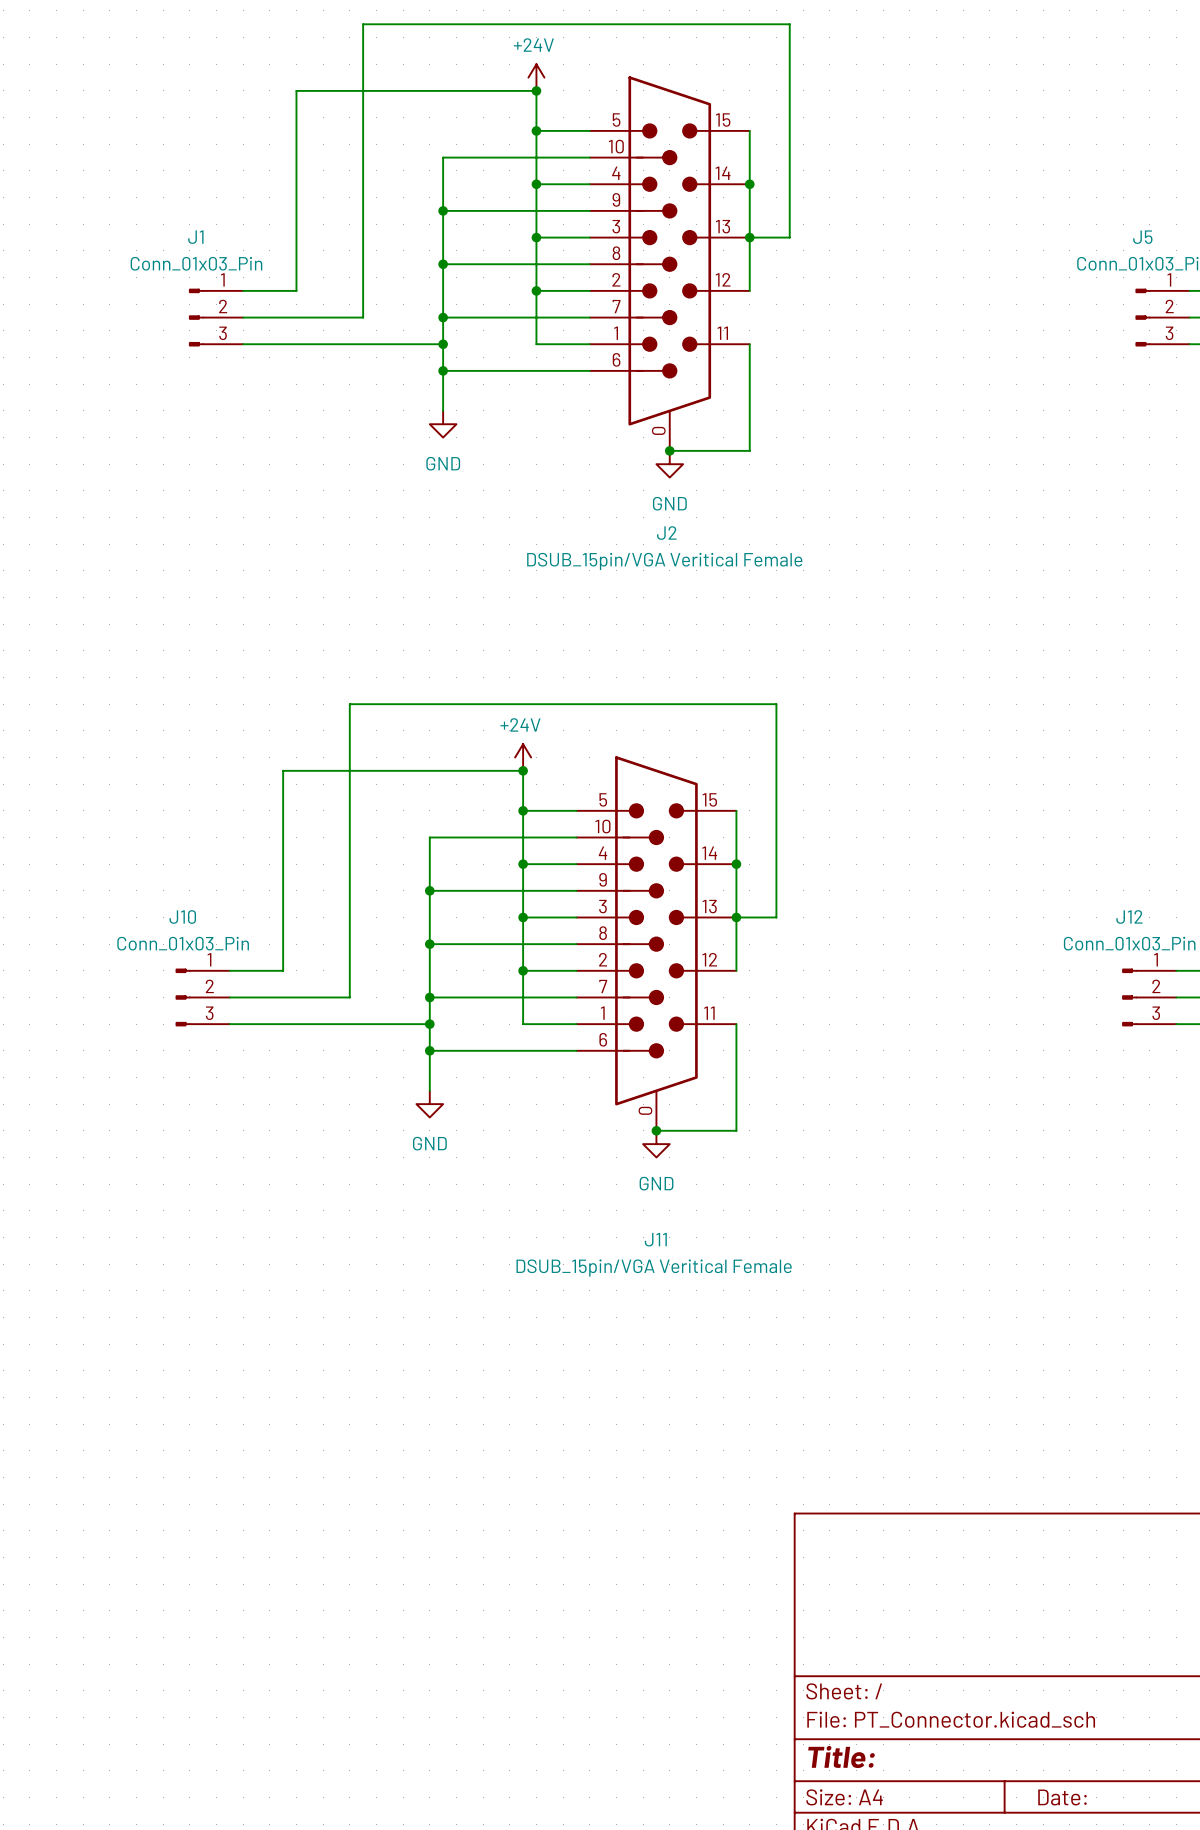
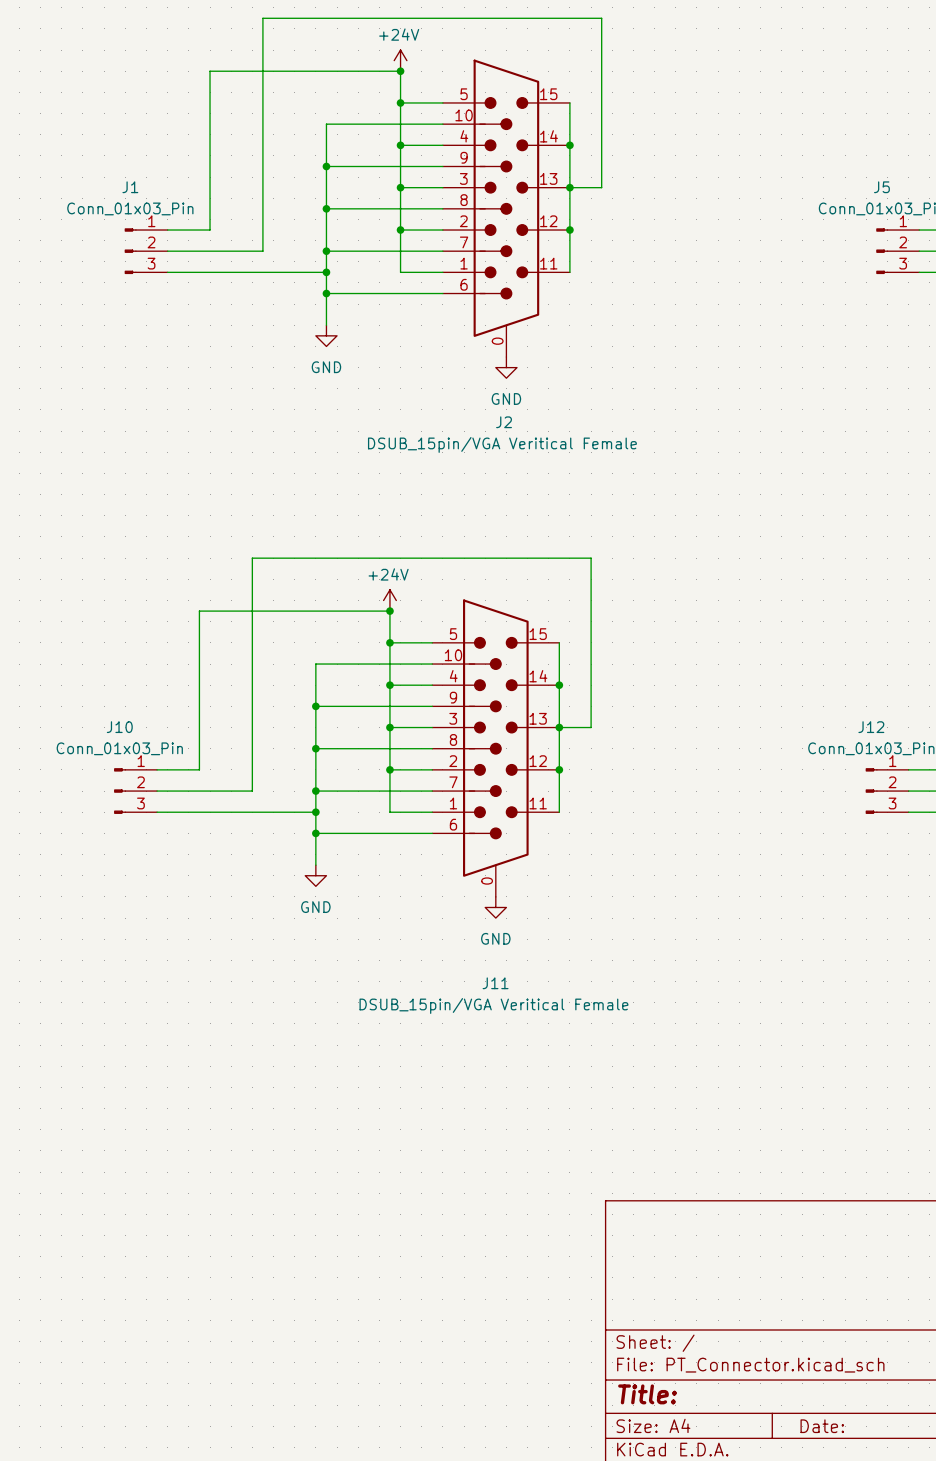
junction: none -> (569, 230)
wire: (749, 344) (749, 450) (669, 450) -> (569, 272) (569, 230)
junction: (669, 450) -> none
junction: none -> (559, 769)
wire: (736, 1024) (736, 1130) (656, 1130) -> (559, 812) (559, 769)
junction: (656, 1130) -> none

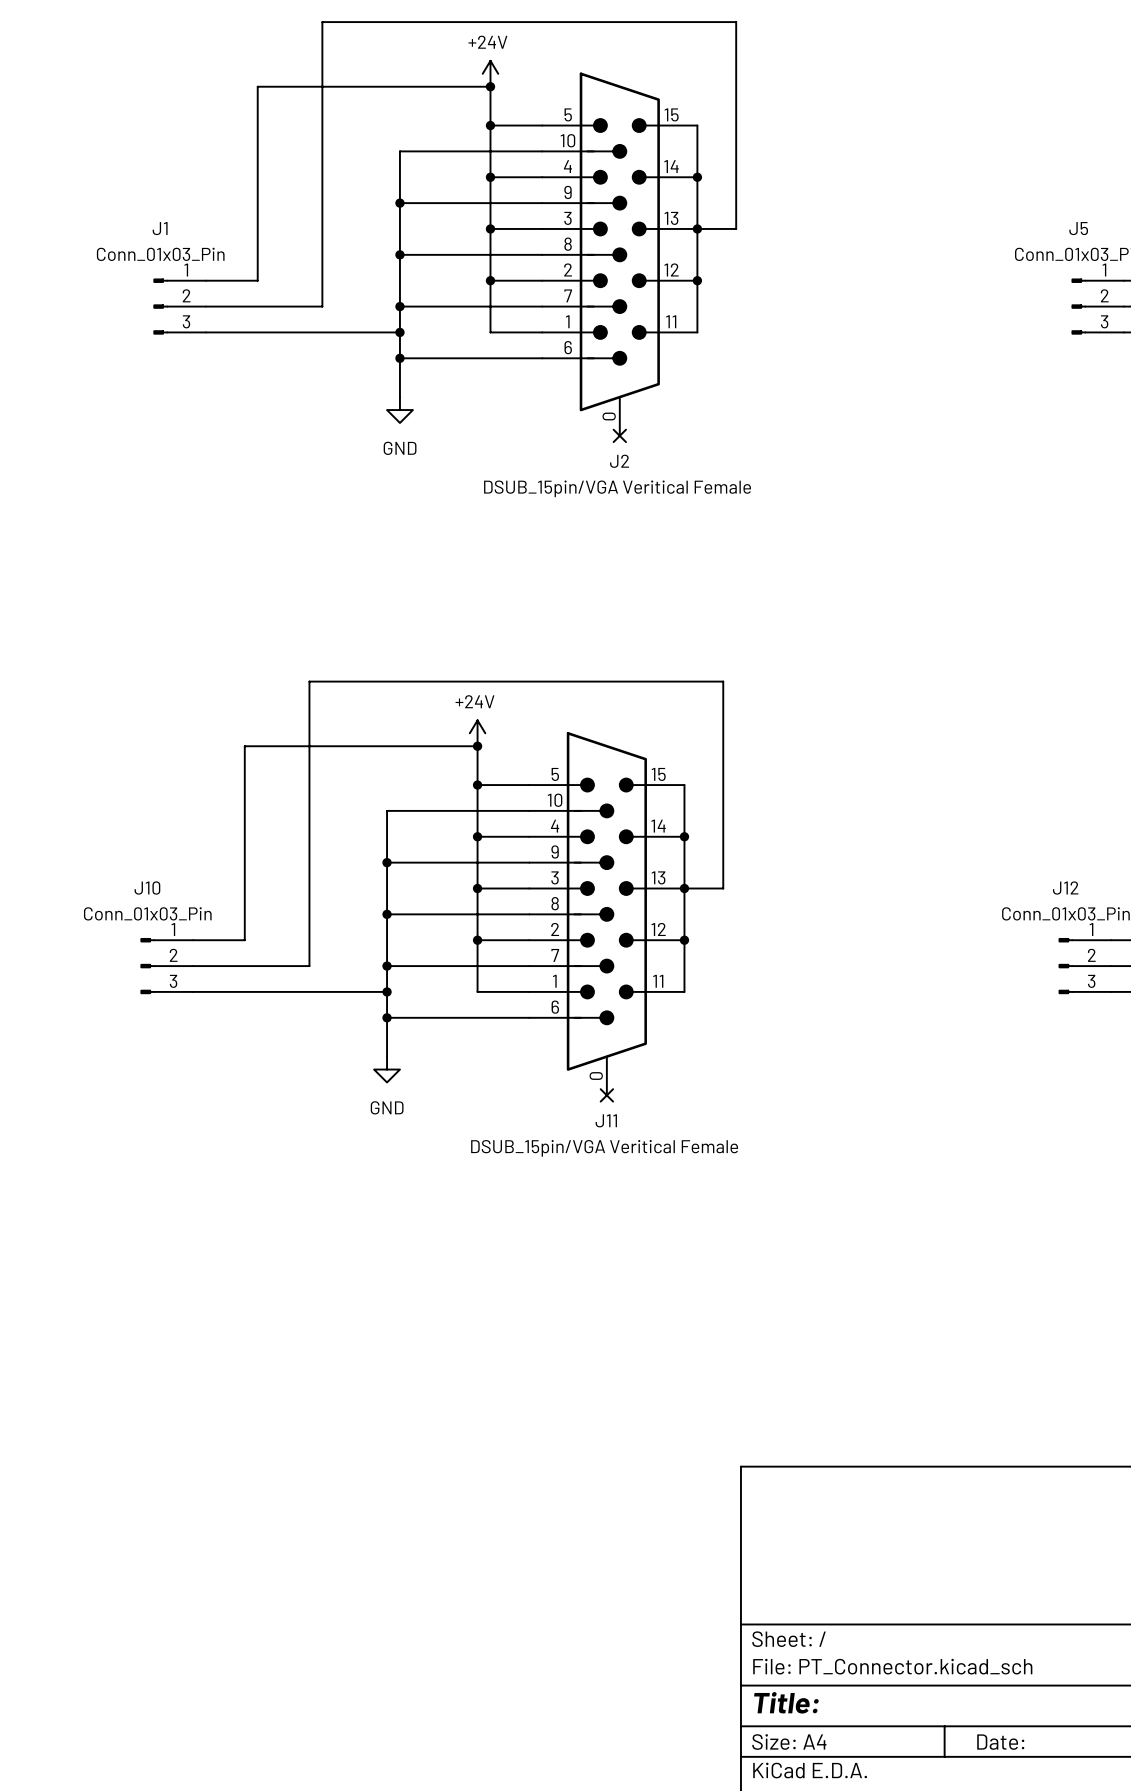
no-connect mark: none -> (619, 435)
power symbol: GND (506, 367) -> none
J2 name position: J2 (504, 422) -> J2 (619, 461)
J2 value position: DSUB_15pin/VGA Veritical Female (502, 444) -> DSUB_15pin/VGA Veritical Female (617, 488)
no-connect mark: none -> (606, 1095)
power symbol: GND (495, 907) -> none
J11 name position: J11 (495, 983) -> J11 (606, 1120)
J11 value position: DSUB_15pin/VGA Veritical Female (493, 1005) -> DSUB_15pin/VGA Veritical Female (604, 1148)

